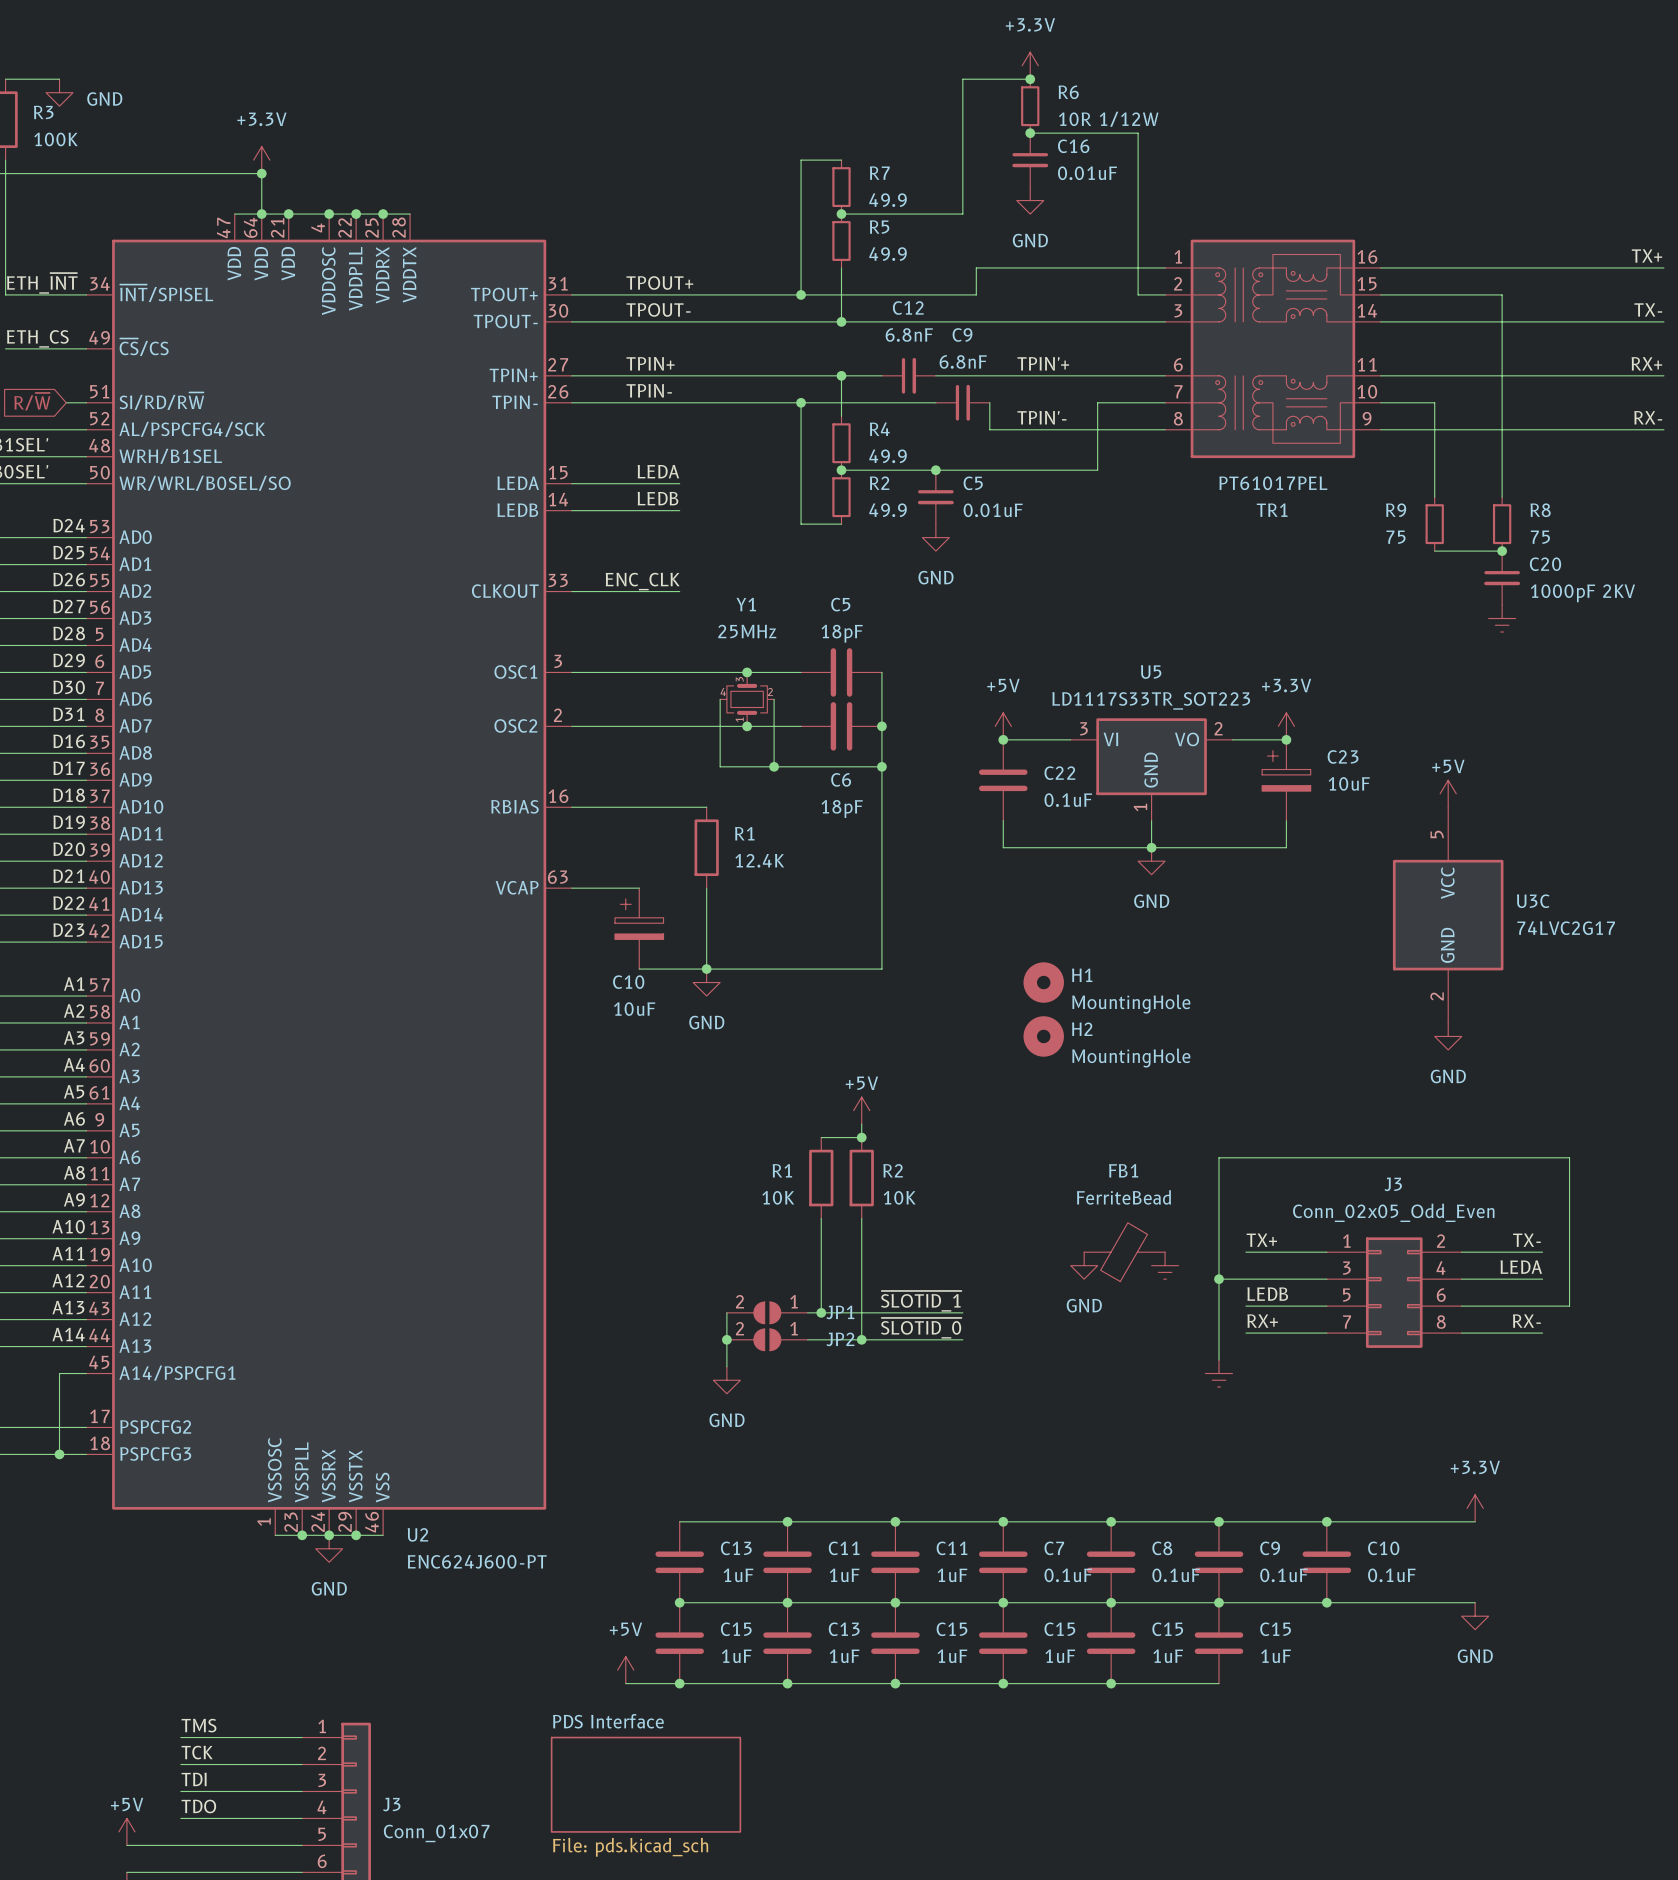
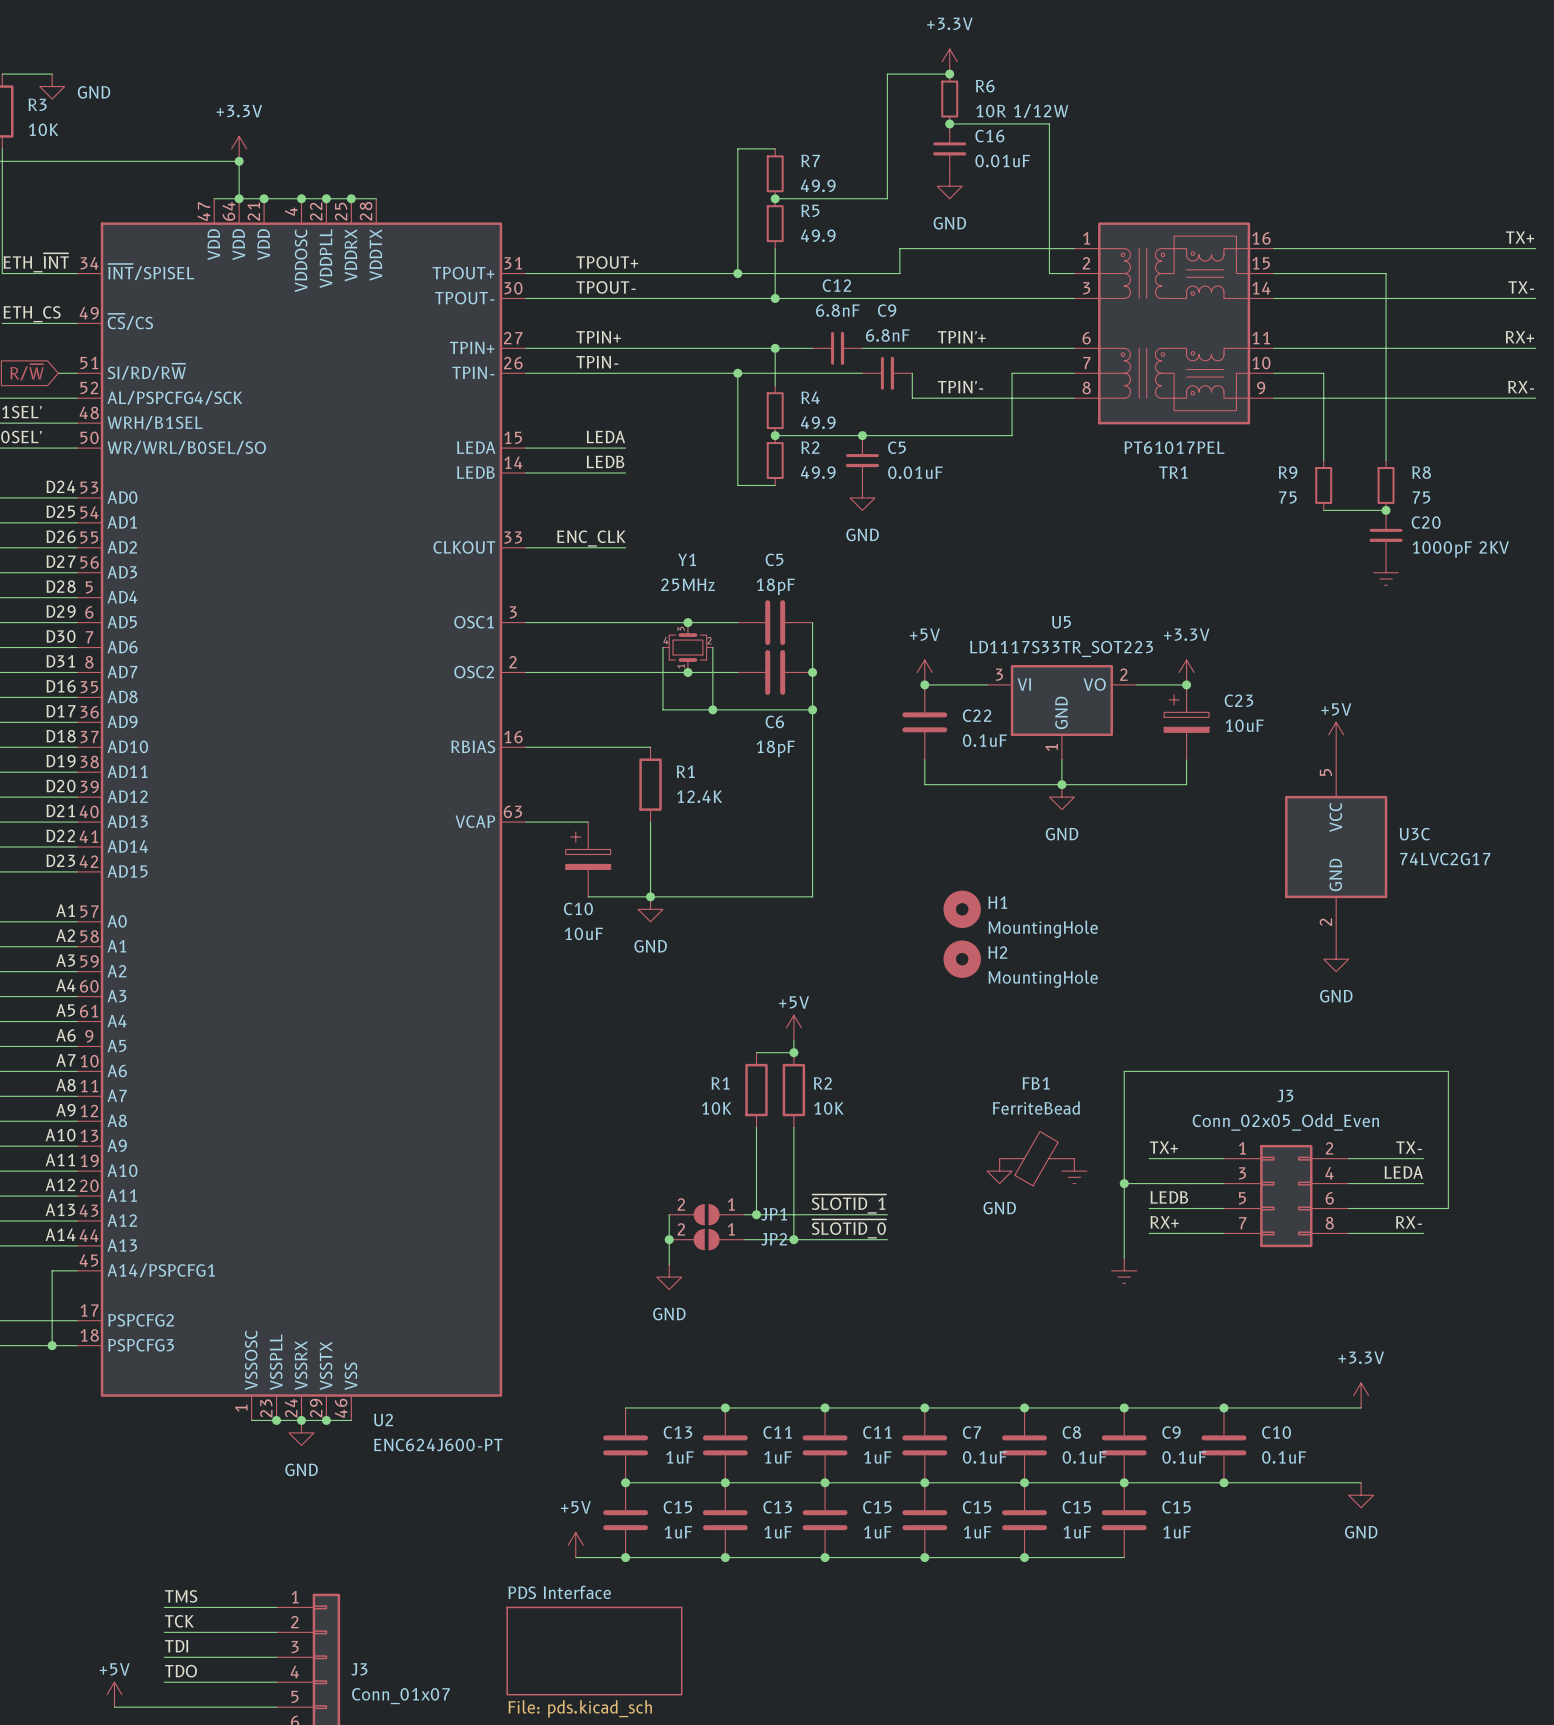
R3 value: 100K (56, 139) -> 10K (43, 129)

